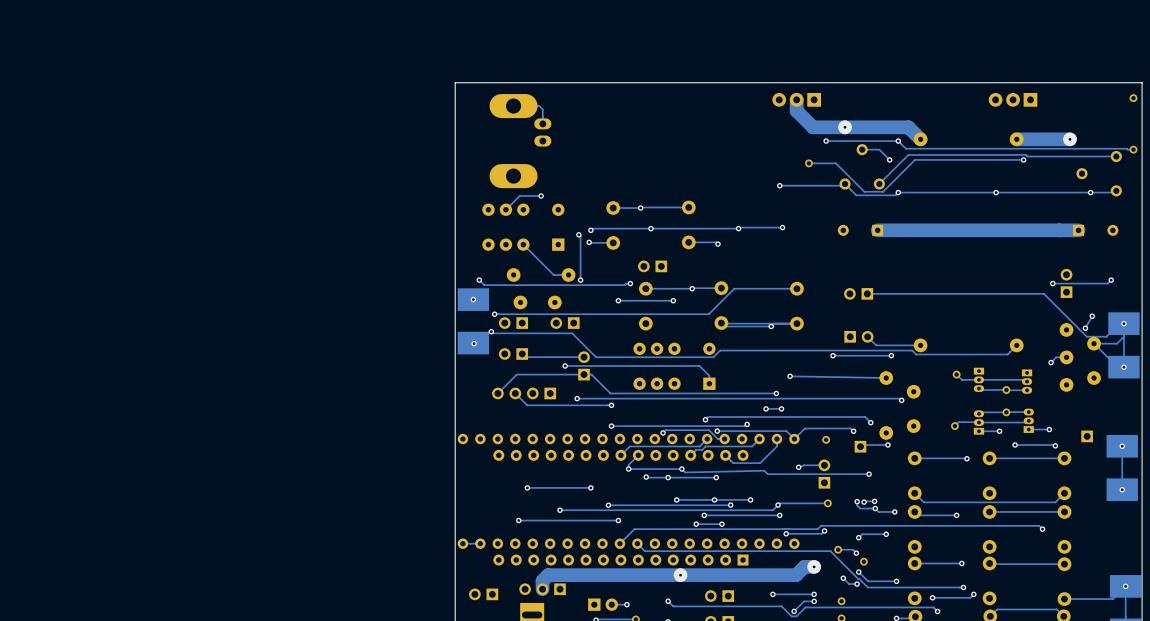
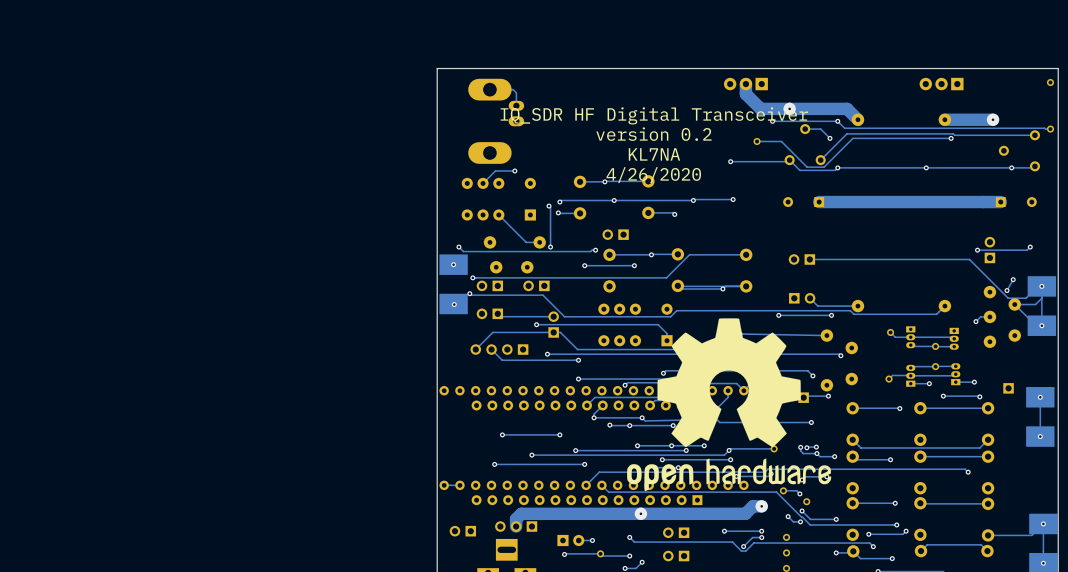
text: none -> IQ_SDR HF Digital Transceiver (654, 115)
text: none -> version 0.2 (653, 134)
text: none -> KL7NA (654, 154)
text: none -> 4/26/2020 (653, 175)
drawing: none -> [627, 318, 832, 492]

